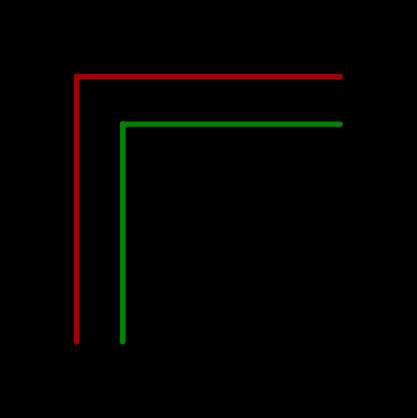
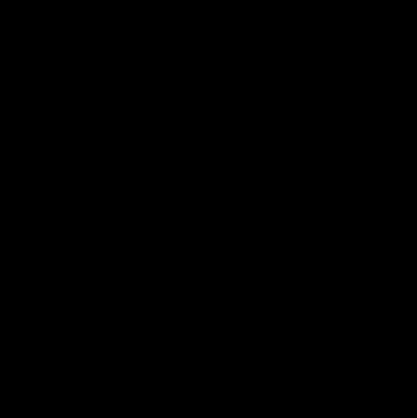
top track: (340, 76) (76, 76) (76, 341) -> none
bottom track: (340, 124) (122, 124) (122, 341) -> none

